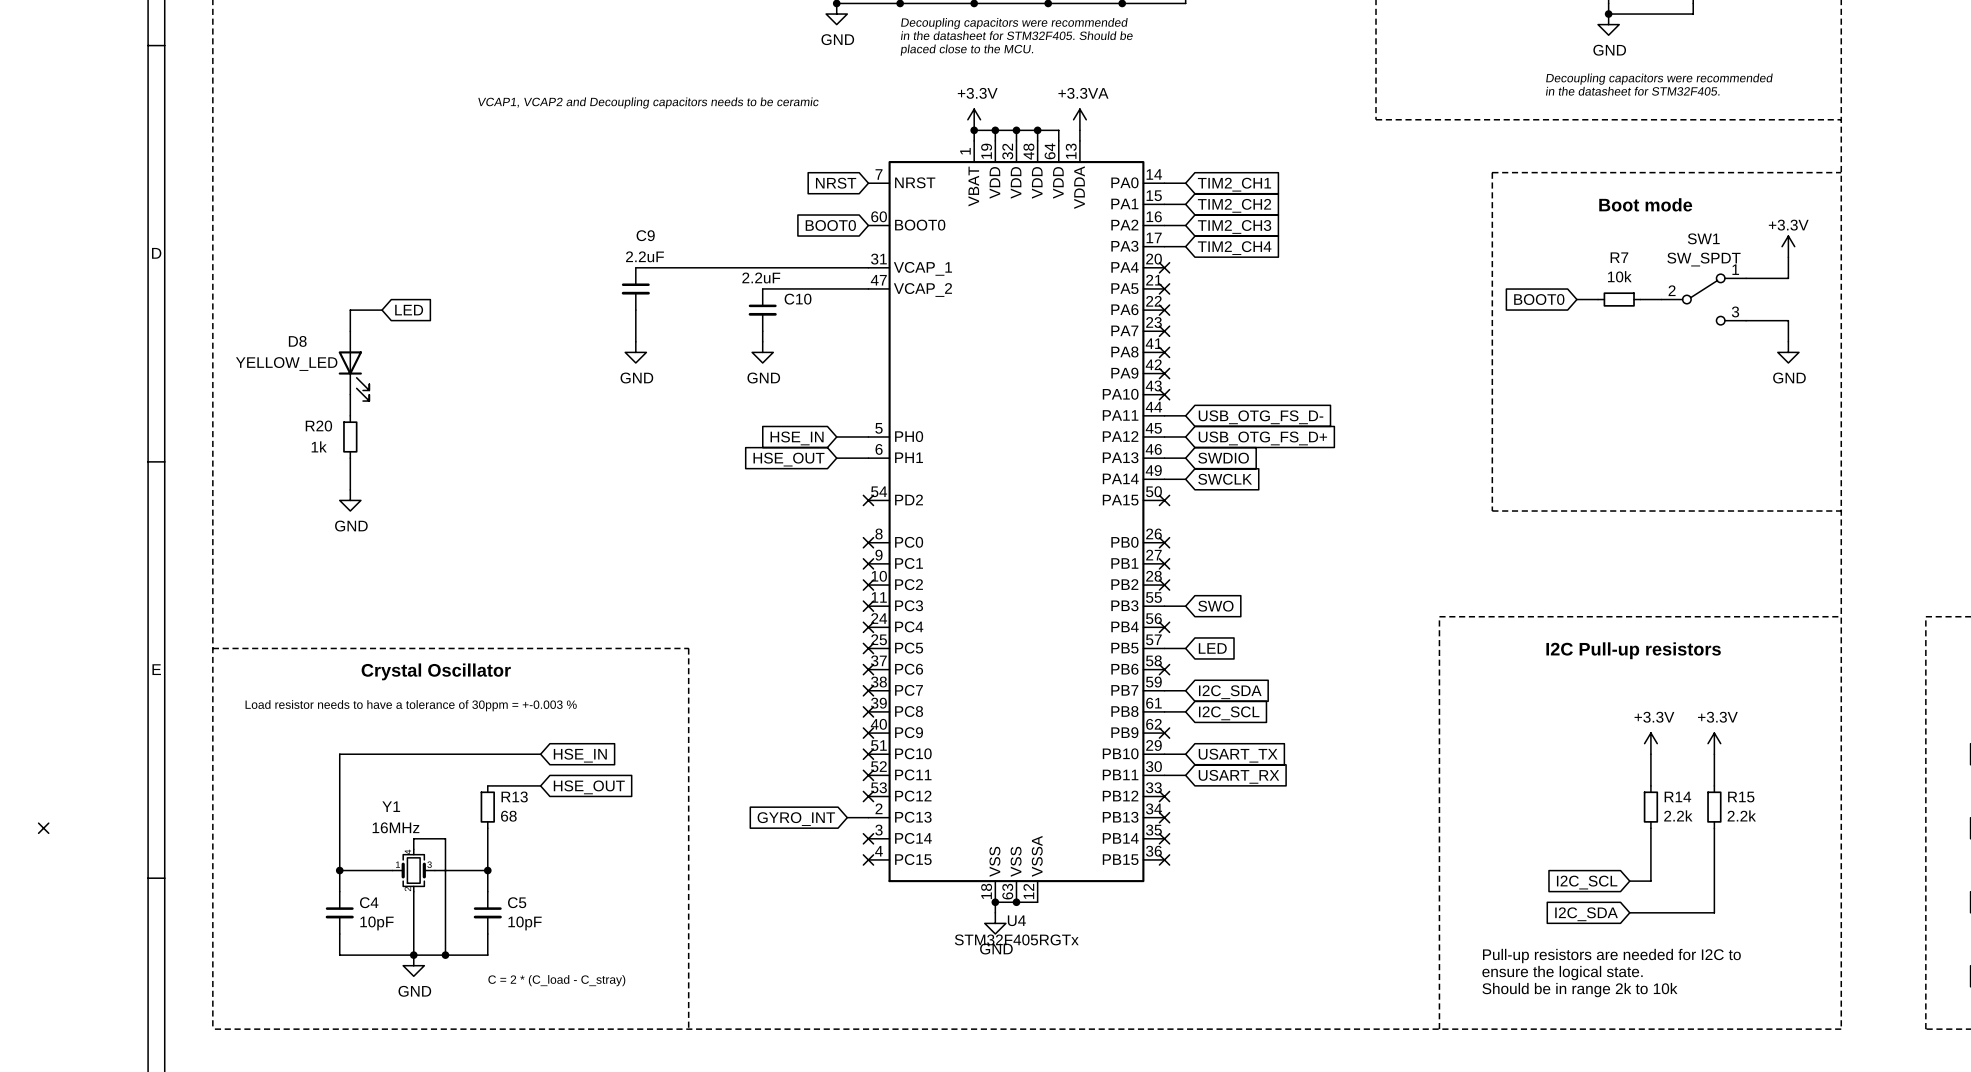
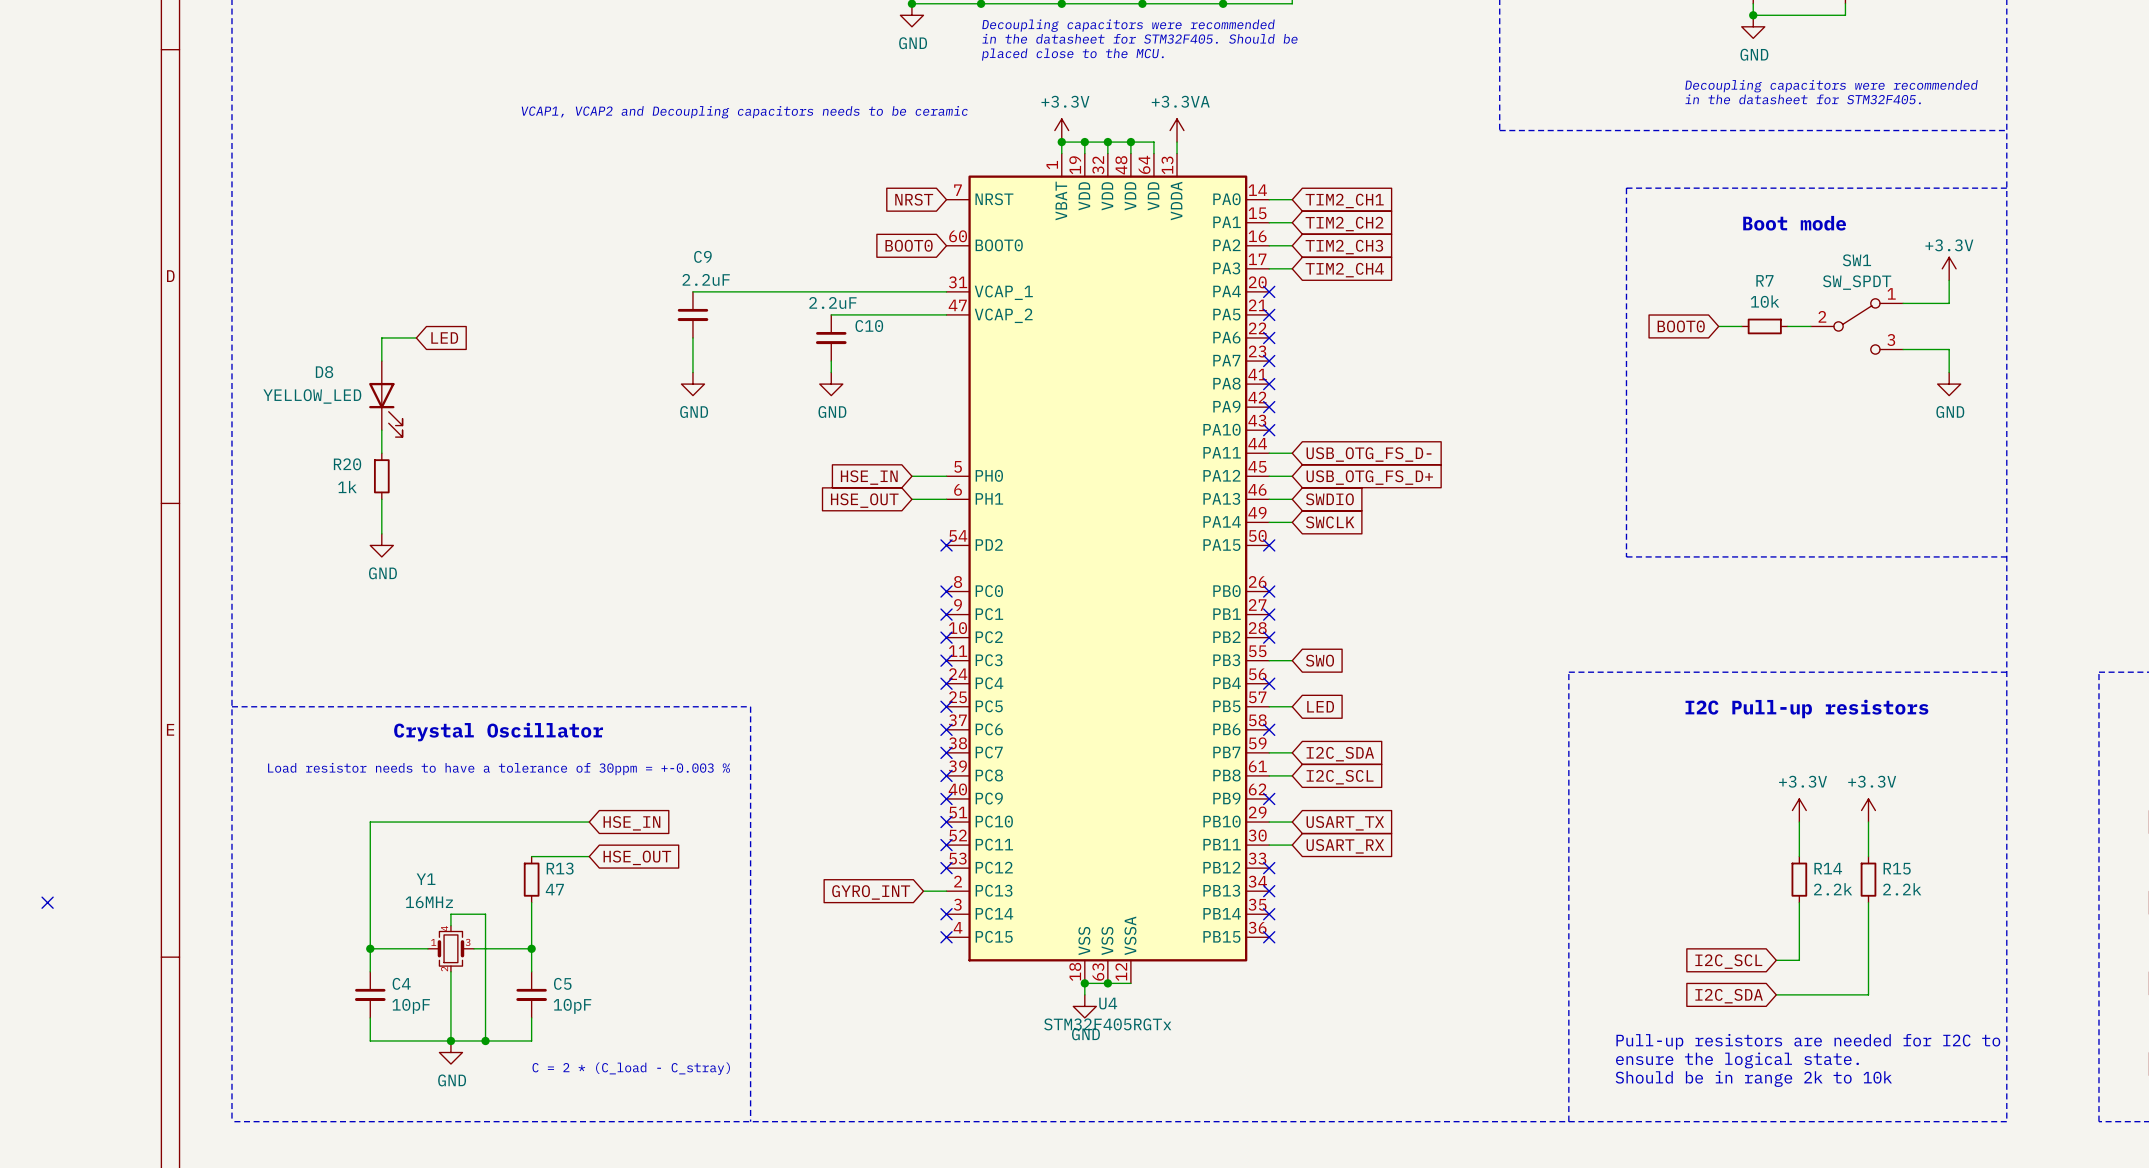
R13 value: 68 (508, 816) -> 47 (554, 889)

